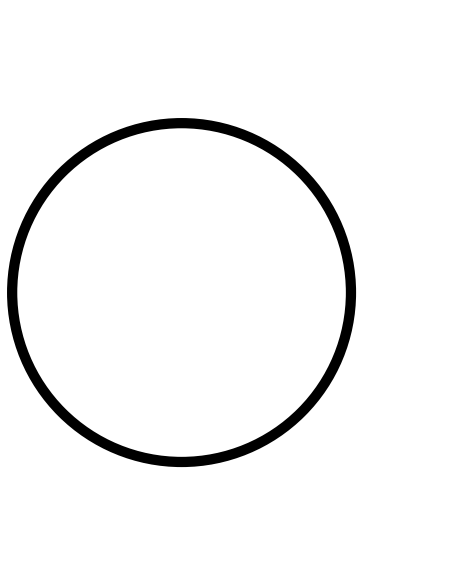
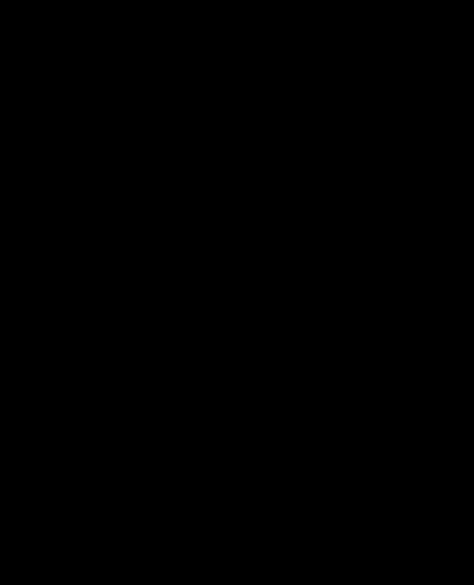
round board edge: [7, 118, 357, 468] -> none

